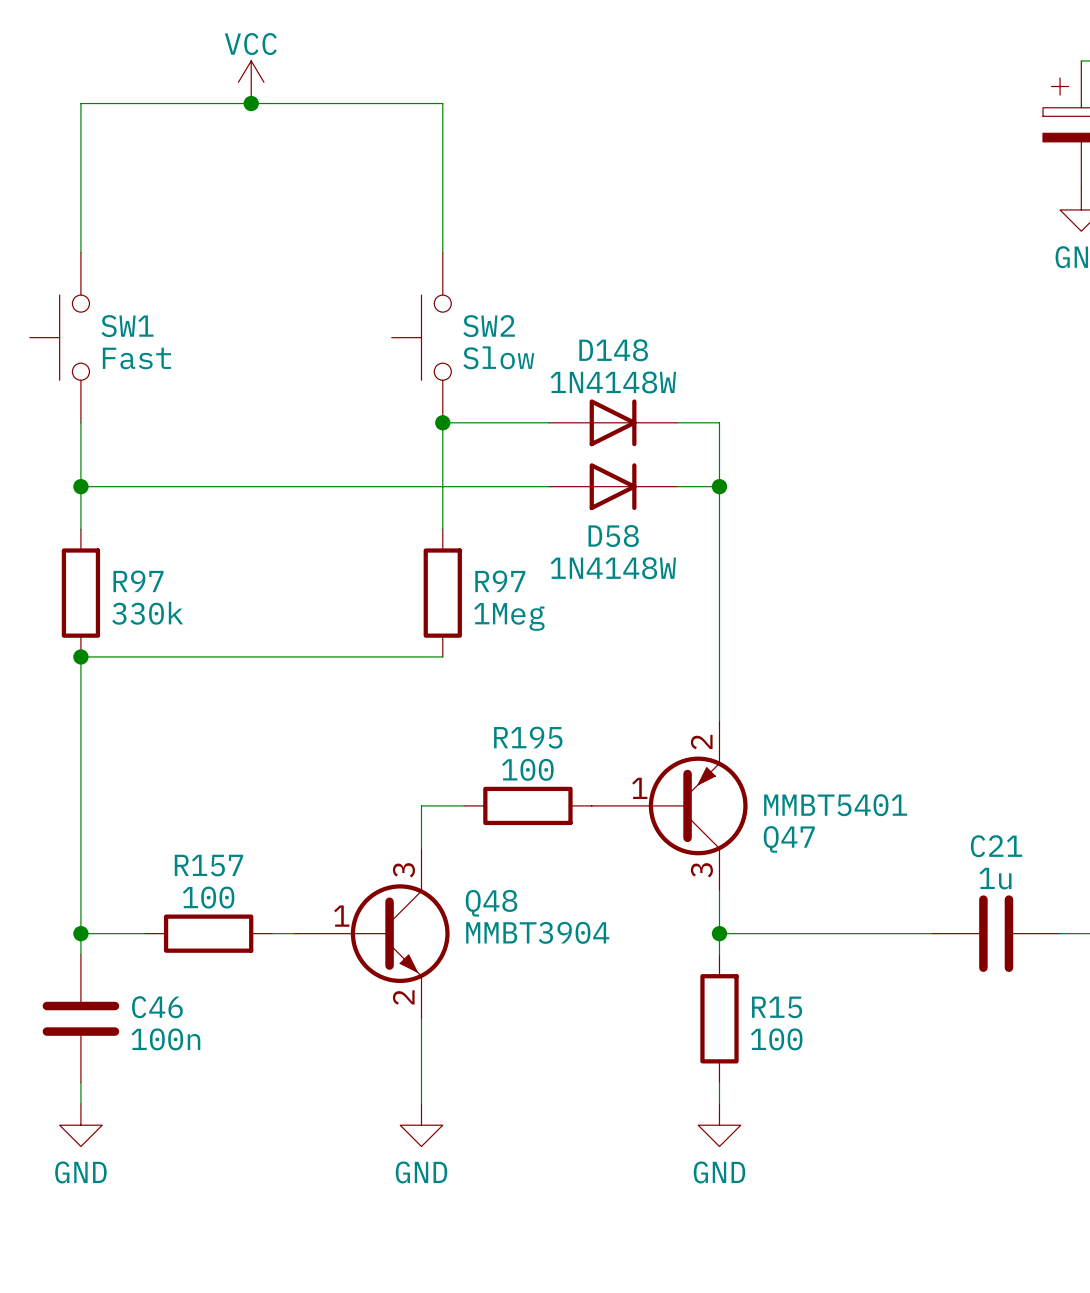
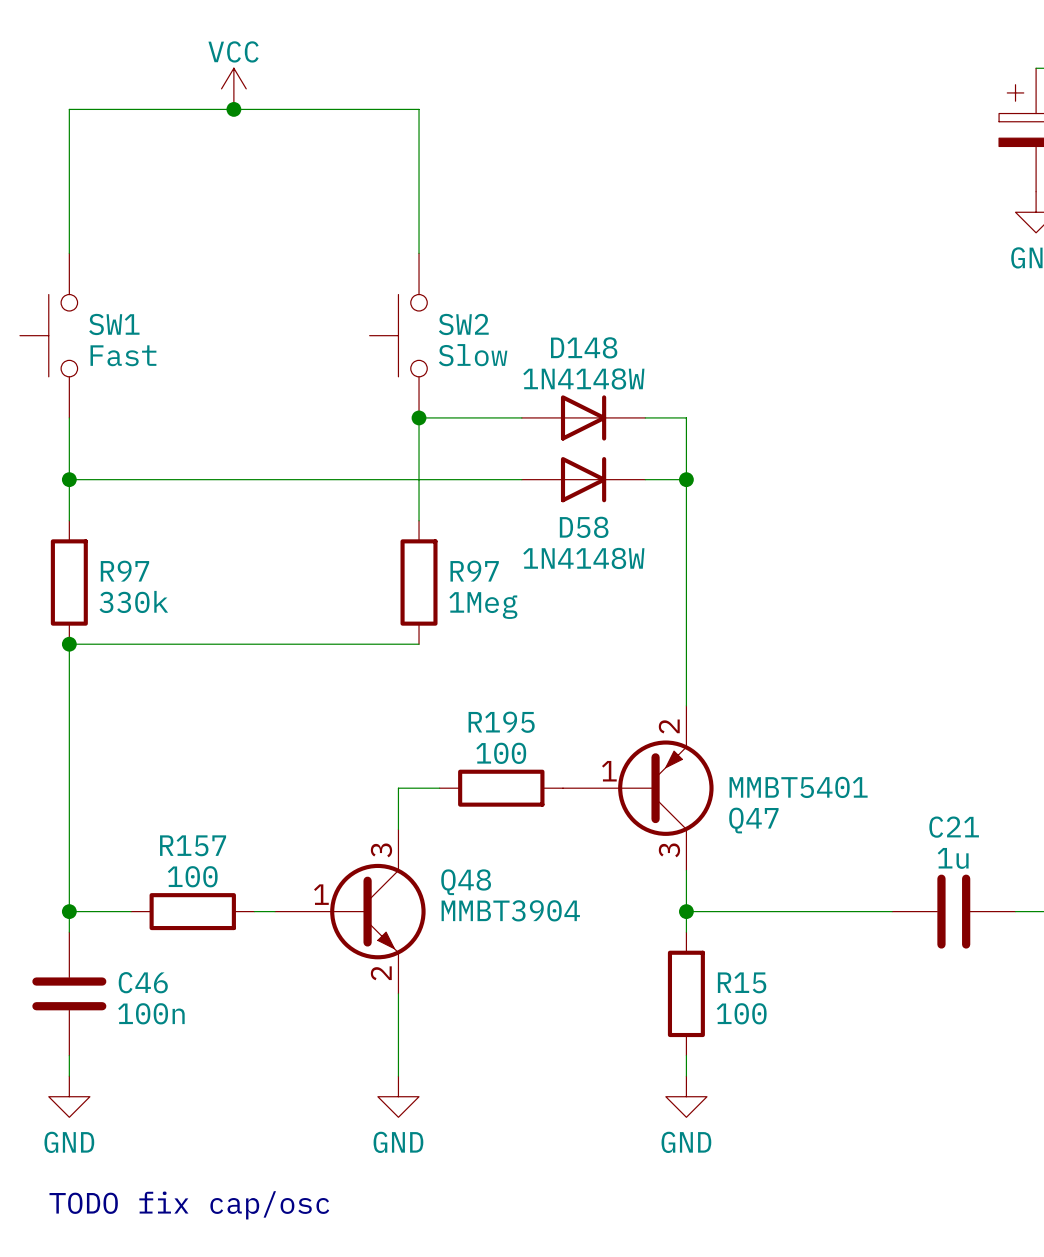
text: none -> TODO fix cap/osc (189, 1205)

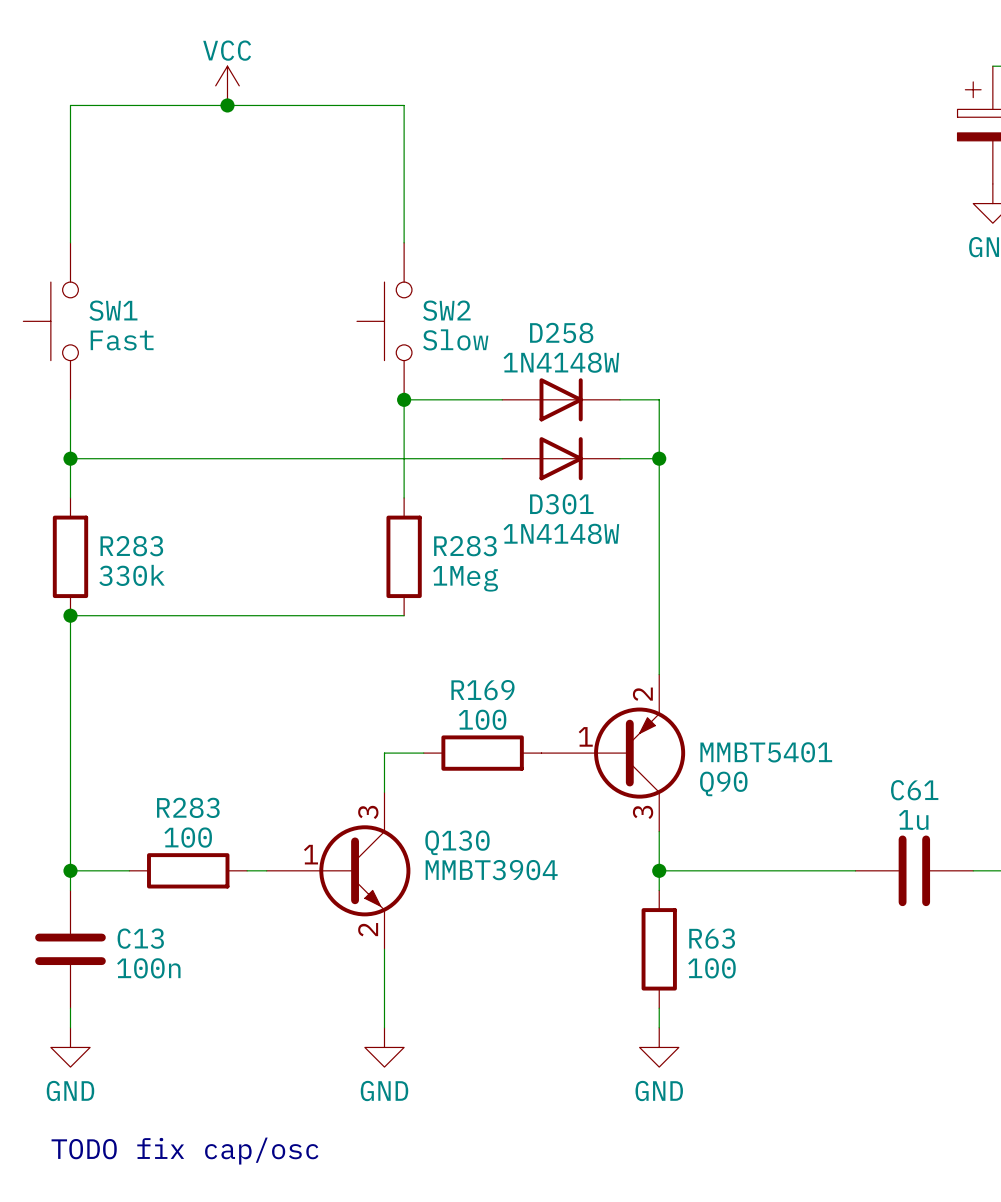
D148 name: D148 (584, 347) -> D258 (561, 332)
D58 name: D58 (584, 527) -> D301 (561, 504)
R97 name: R97 (124, 571) -> R283 (131, 546)
R97 name: R97 (474, 571) -> R283 (465, 546)
R195 name: R195 (501, 722) -> R169 (482, 690)
Q47 name: Q47 (753, 820) -> Q90 (723, 783)
C21 name: C21 (954, 827) -> C61 (914, 790)
R157 name: R157 (193, 845) -> R283 (188, 807)
Q48 name: Q48 (466, 882) -> Q130 (457, 842)
C46 name: C46 (143, 982) -> C13 (140, 938)
R15 name: R15 (742, 982) -> R63 (712, 938)

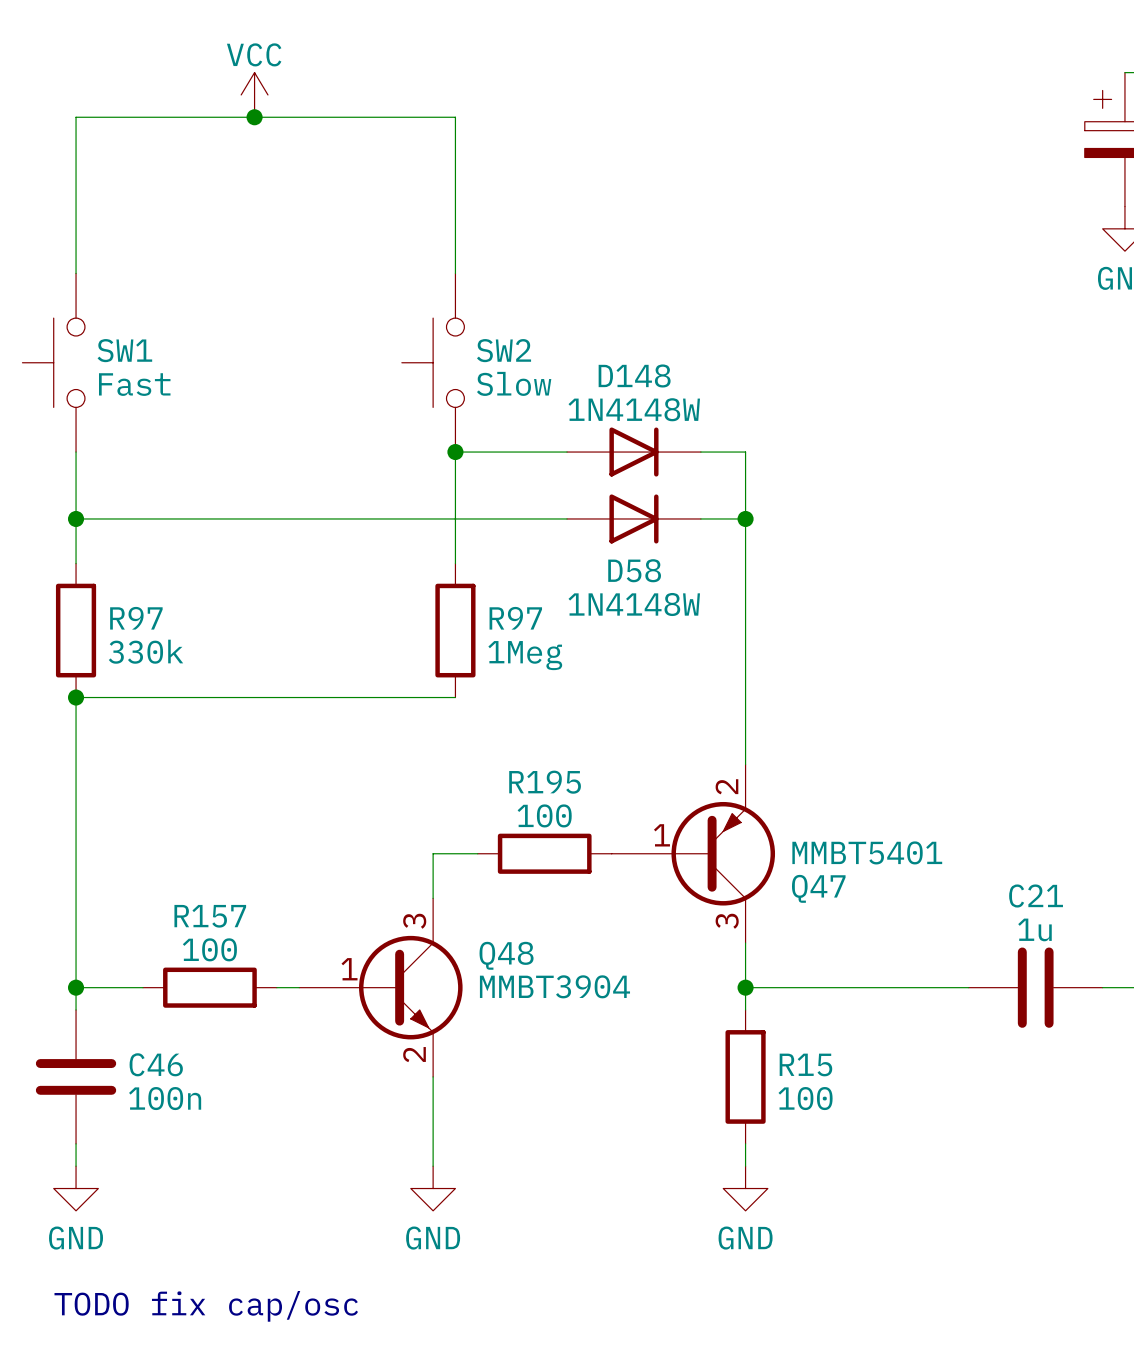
D258 name: D258 (561, 332) -> D148 (634, 375)
D301 name: D301 (561, 504) -> D58 (634, 570)
R283 name: R283 (131, 546) -> R97 (136, 618)
R283 name: R283 (465, 546) -> R97 (515, 618)
R169 name: R169 (482, 690) -> R195 (545, 782)
Q90 name: Q90 (723, 783) -> Q47 (818, 888)
C61 name: C61 (914, 790) -> C21 (1036, 895)
R283 name: R283 (188, 807) -> R157 (210, 916)
Q130 name: Q130 (457, 842) -> Q48 (506, 955)
C13 name: C13 (140, 938) -> C46 (156, 1064)
R63 name: R63 (712, 938) -> R15 (805, 1064)

